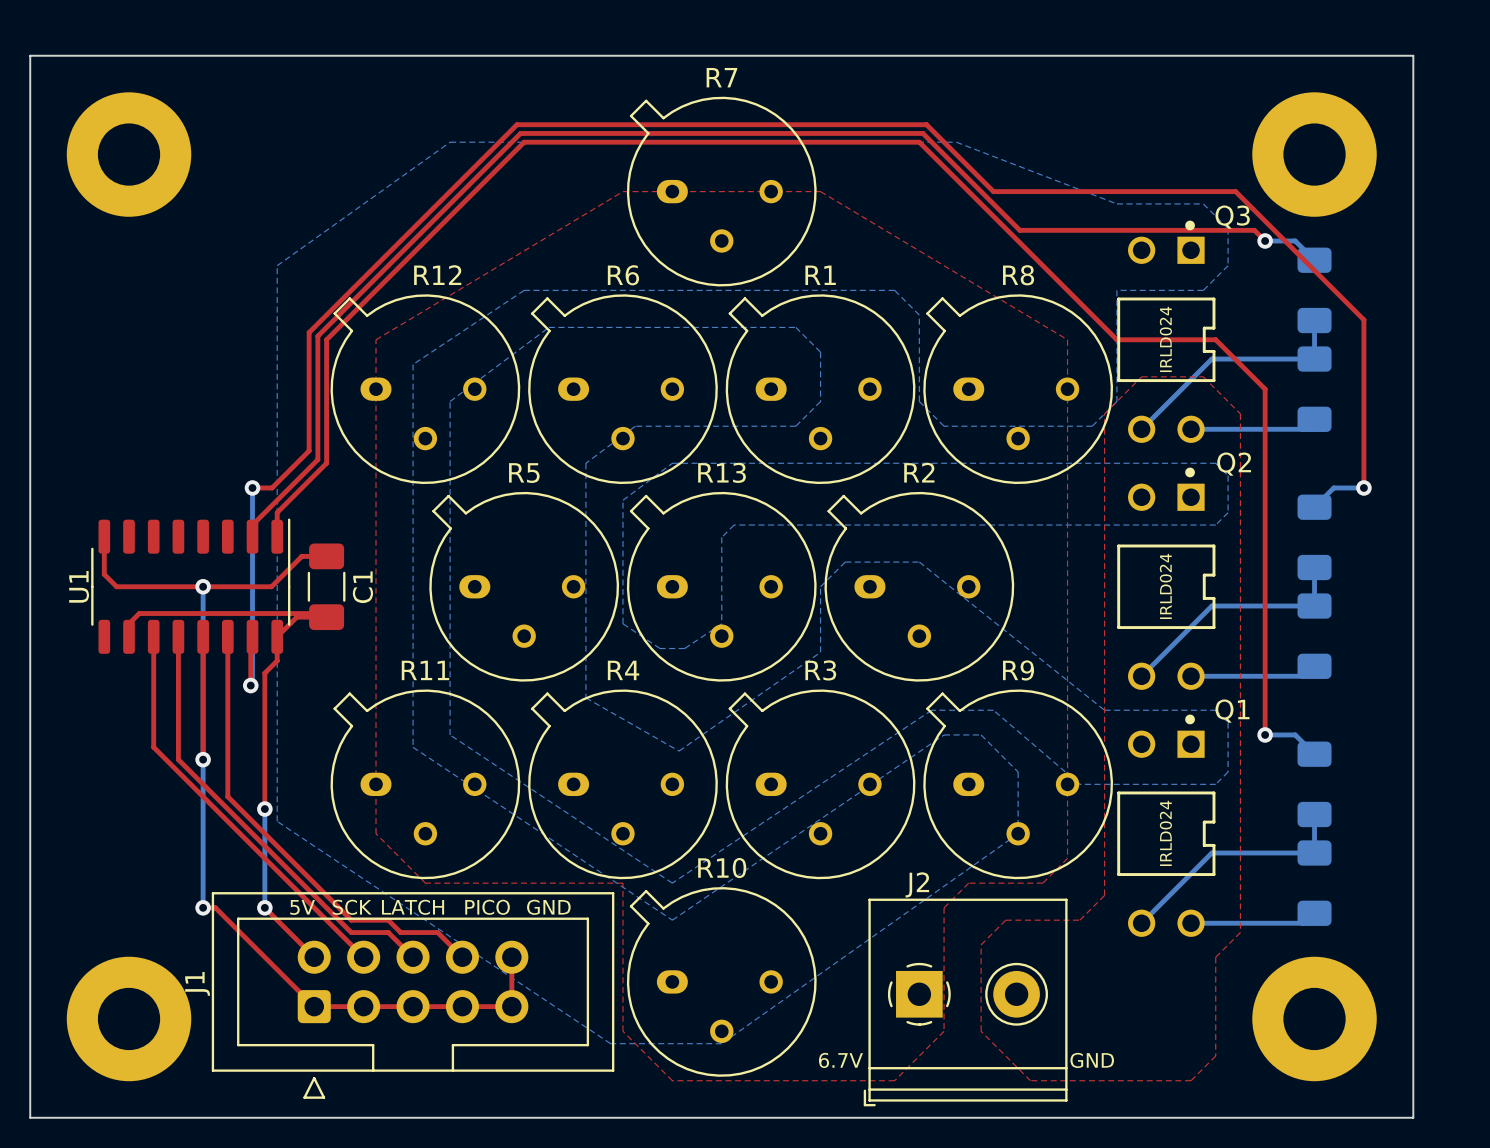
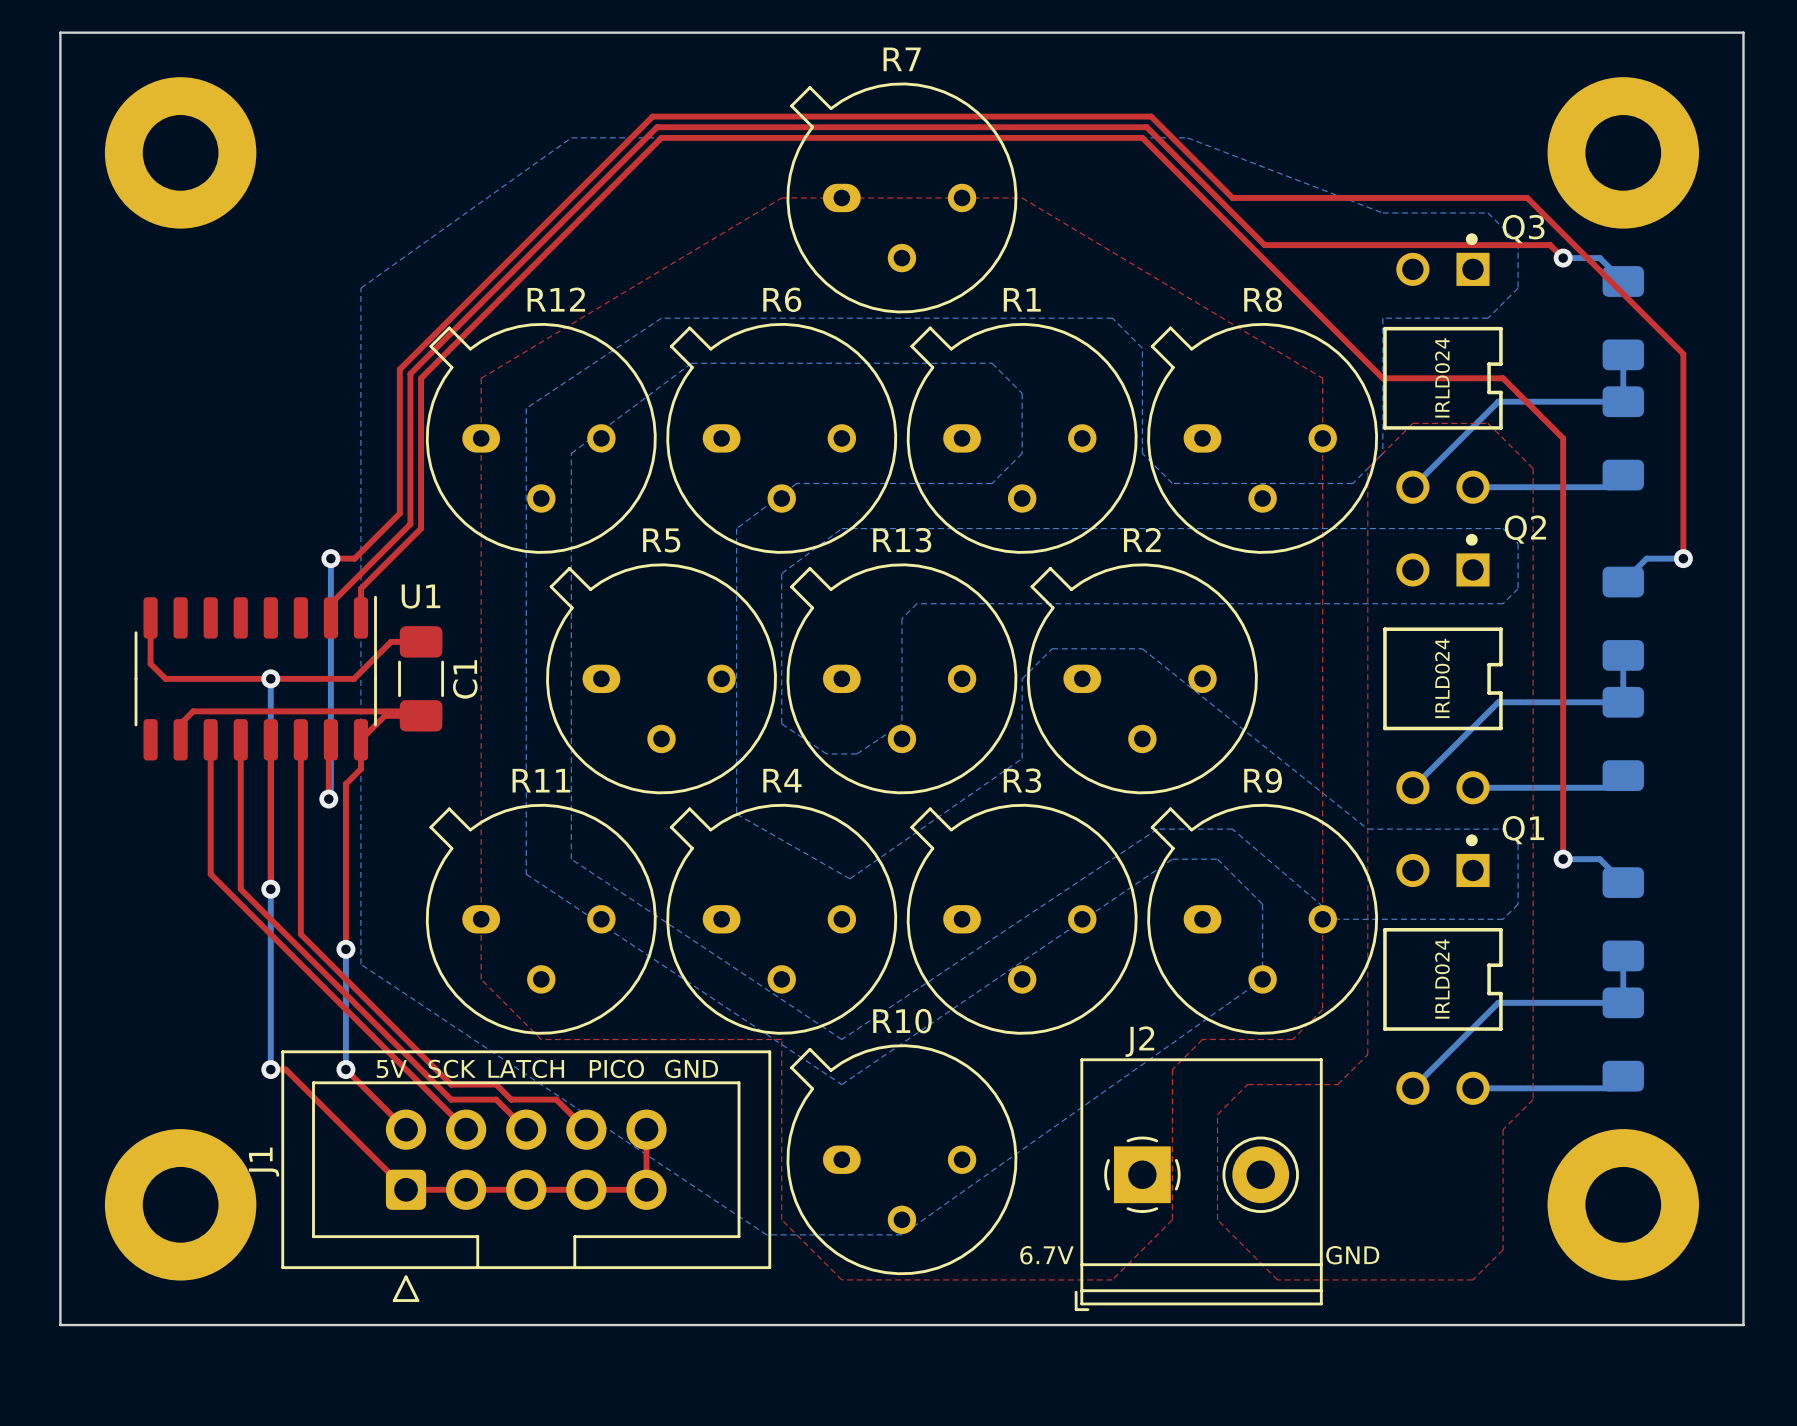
U1 name rotation: 0° (79, 586) -> 90° clockwise (420, 596)
U1 name position: U1 (79, 586) -> U1 (420, 596)

